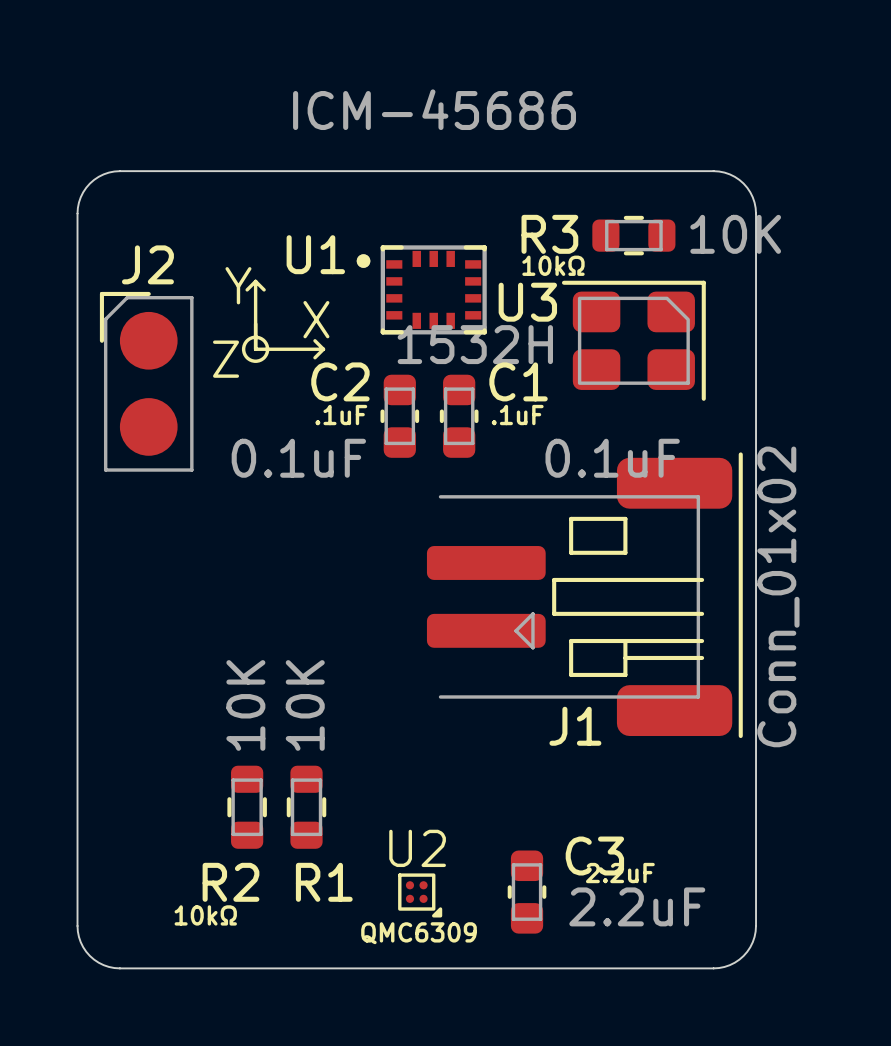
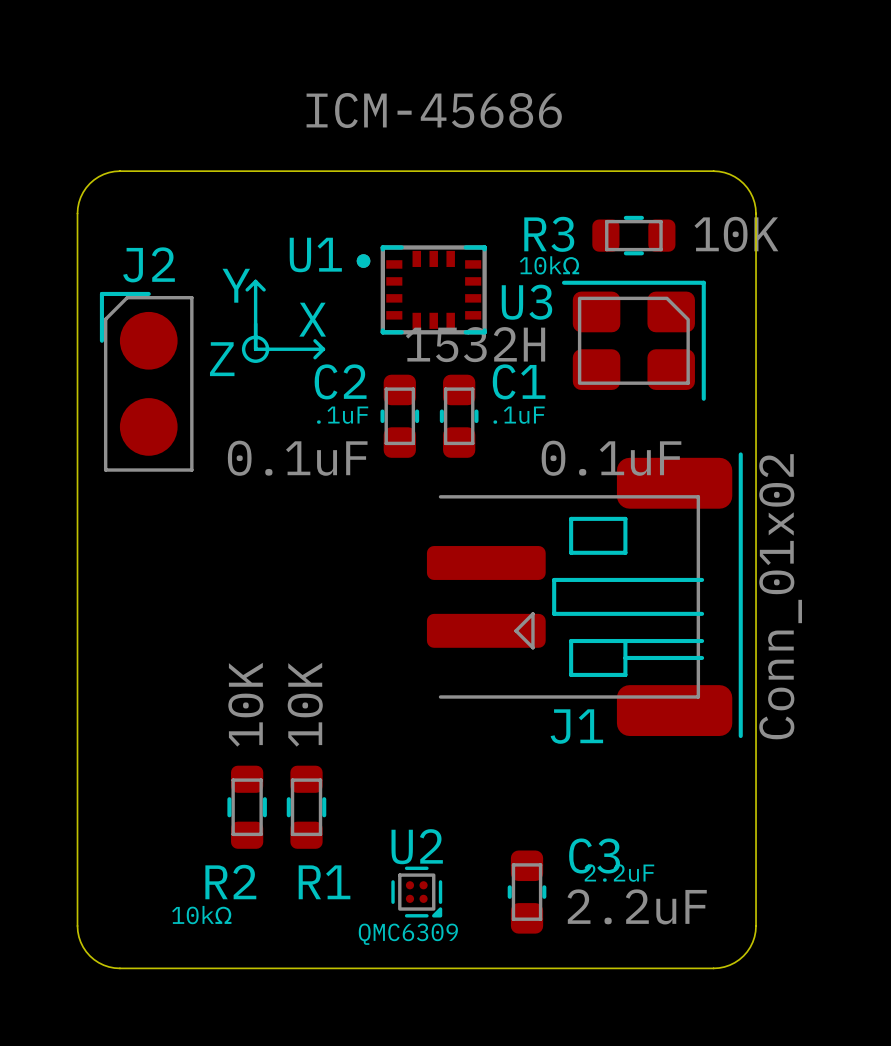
U2 footprint: [398, 873, 443, 918] -> [391, 866, 443, 918]

